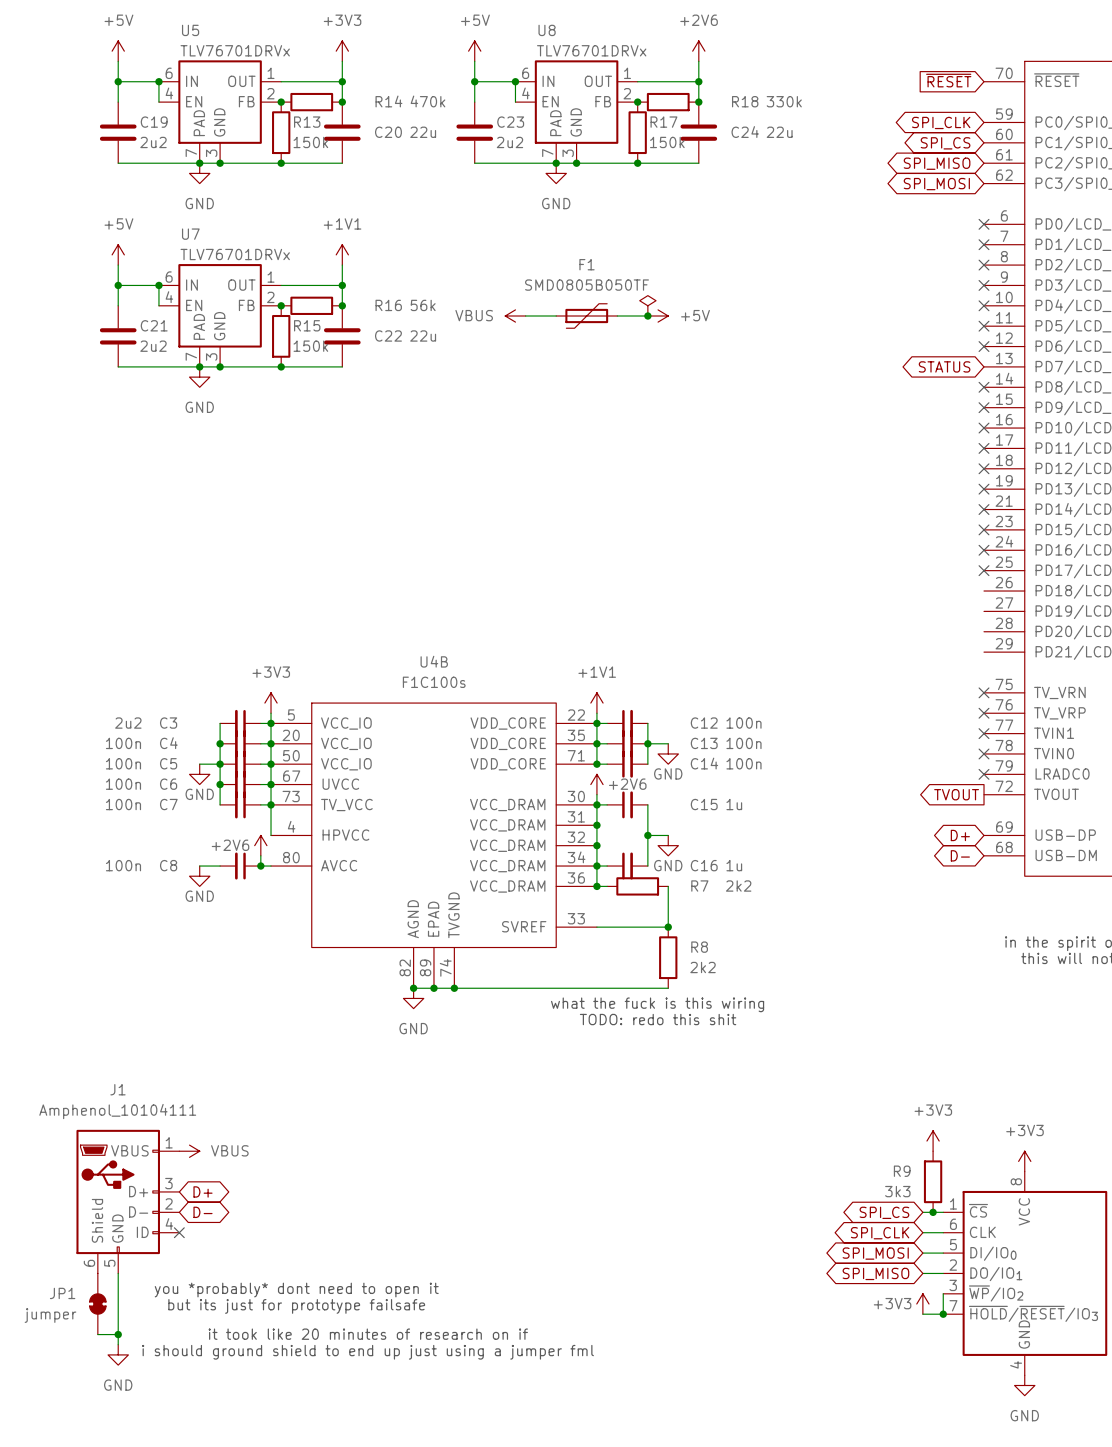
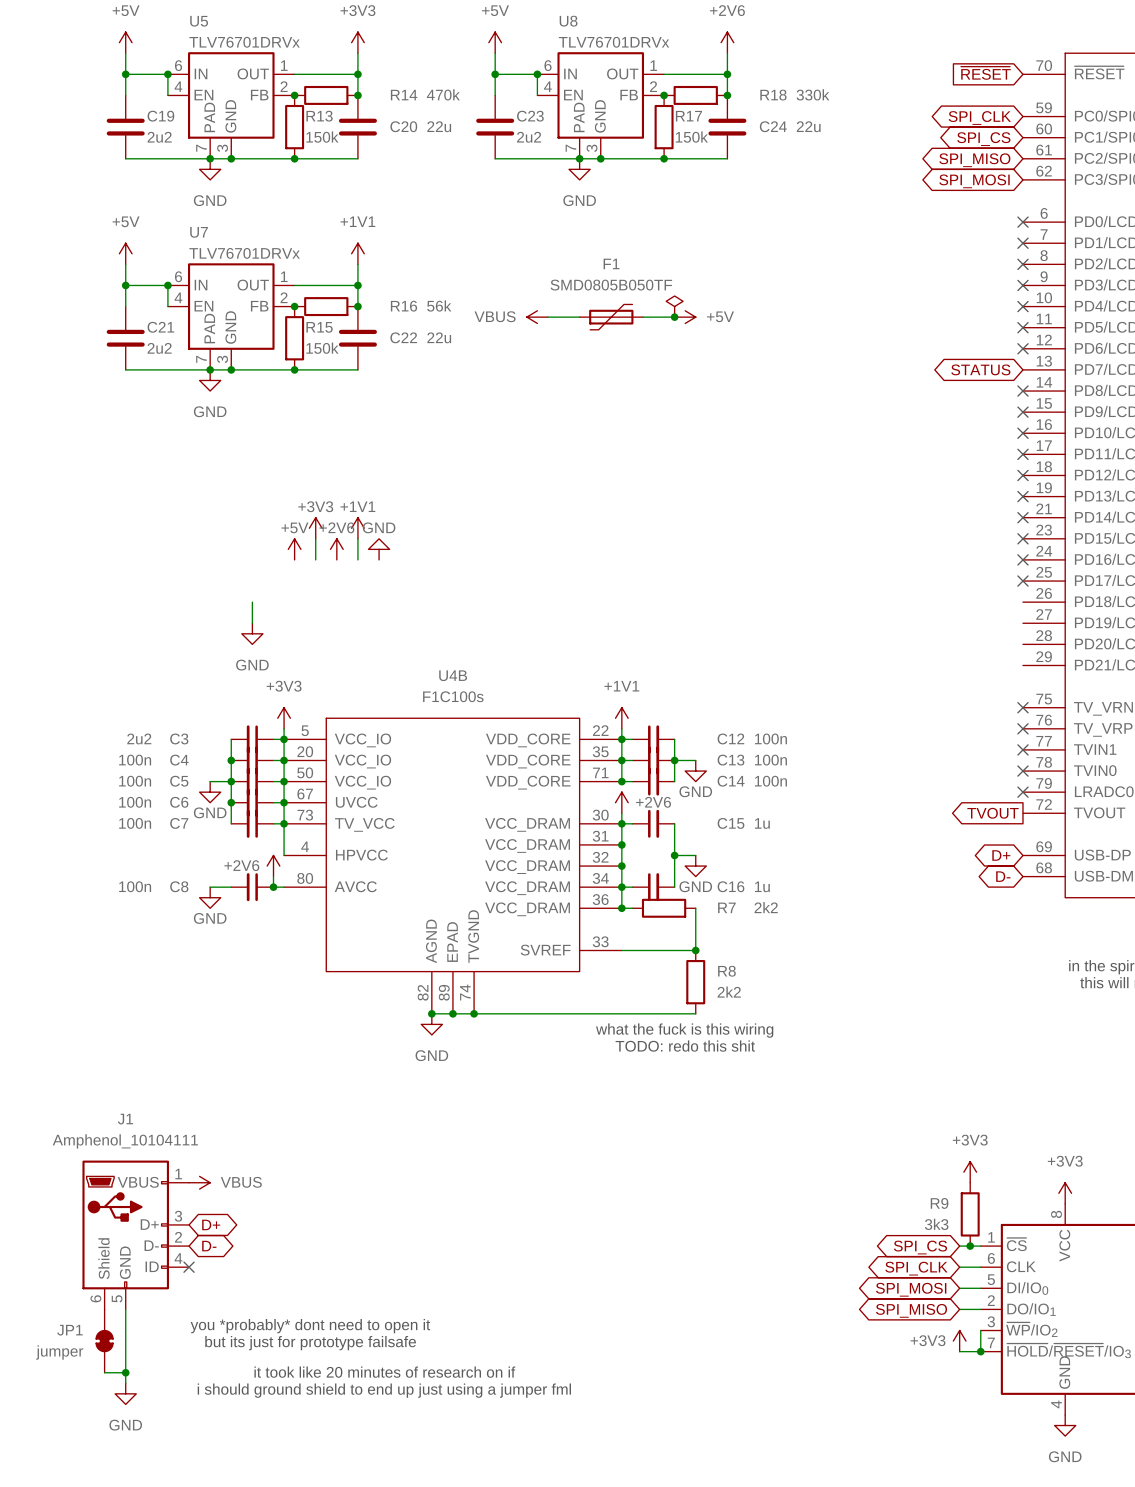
power symbol: none -> +3V3 (315, 528)
power symbol: none -> +1V1 (357, 528)
wire: none -> (315, 538) (315, 559)
wire: none -> (357, 538) (357, 559)
power symbol: none -> +5V (294, 549)
power symbol: none -> +2V6 (336, 549)
power symbol: none -> GND (379, 549)
wire: none -> (252, 602) (252, 623)
power symbol: none -> GND (252, 633)

